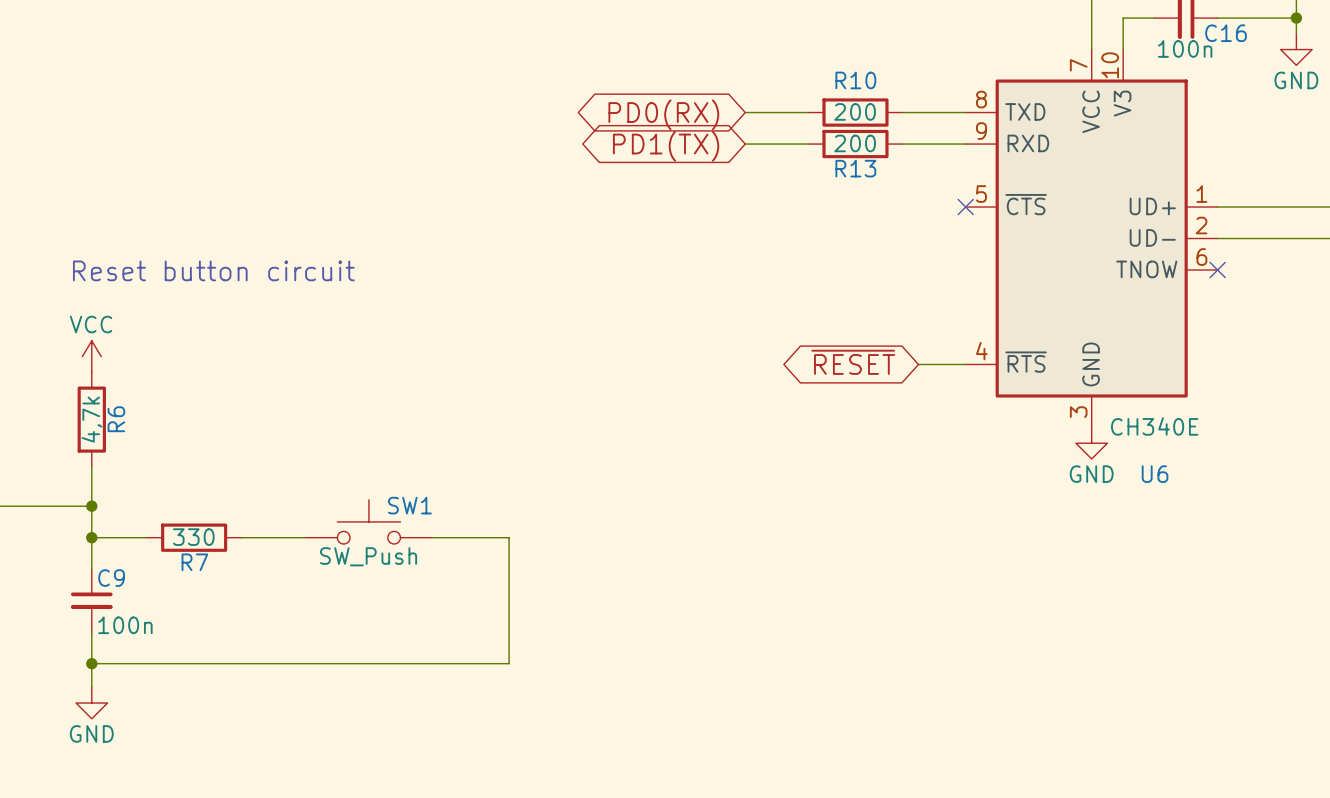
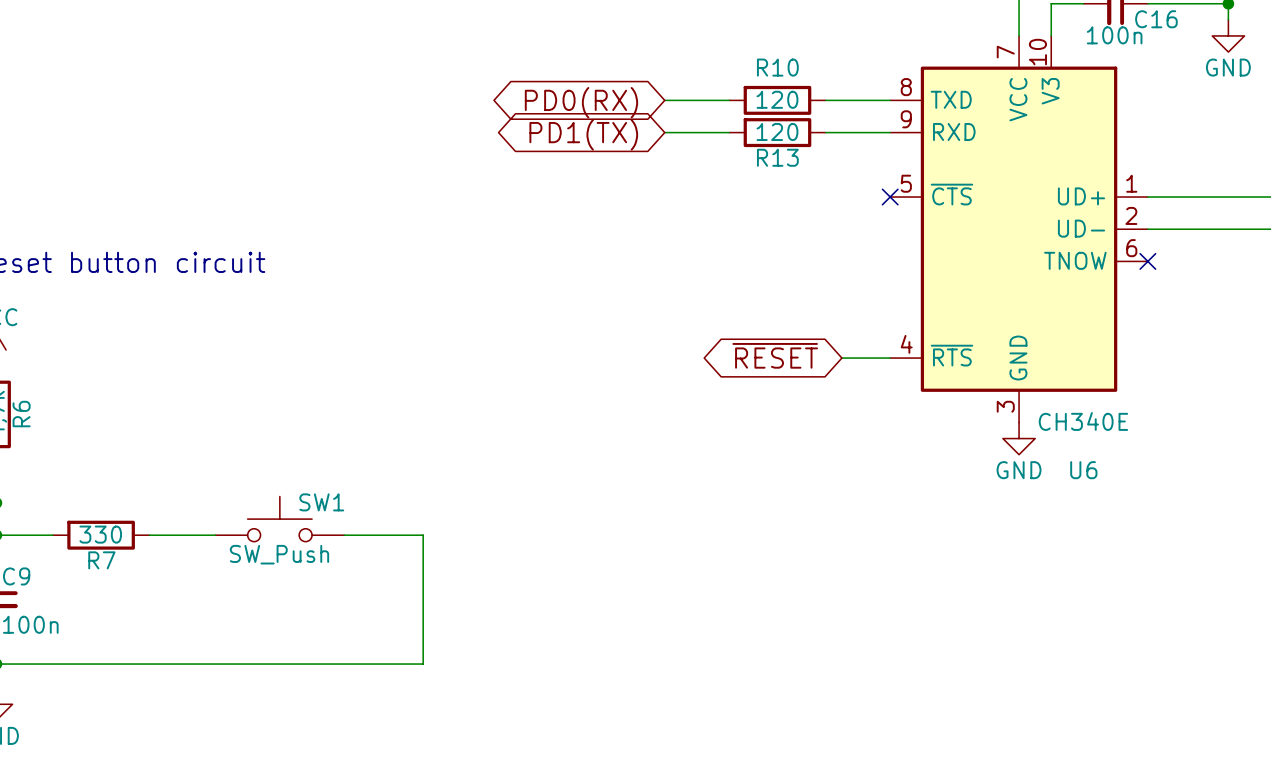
R10 value: 200 (855, 111) -> 120 (777, 99)
R13 value: 200 (855, 143) -> 120 (777, 131)

